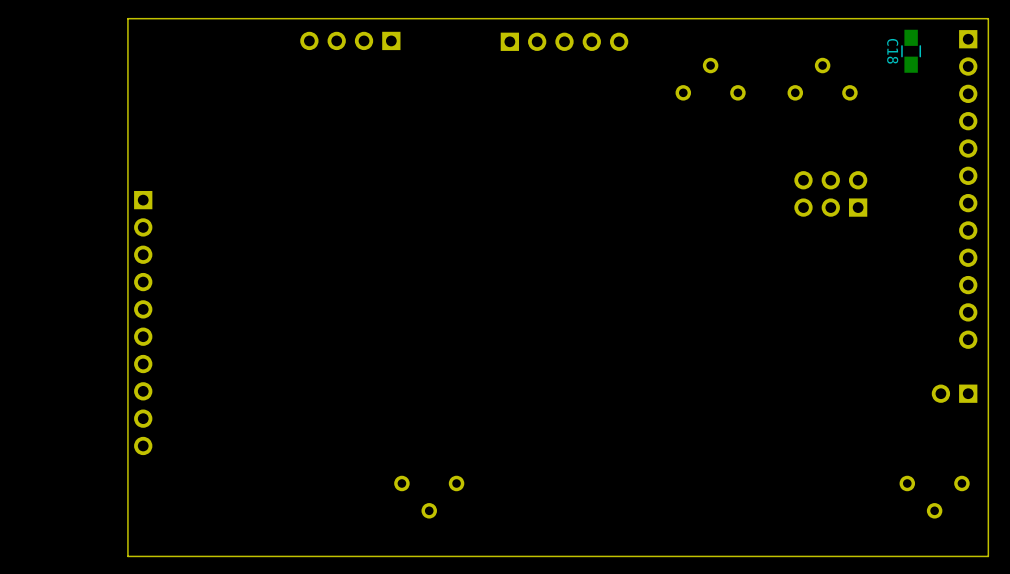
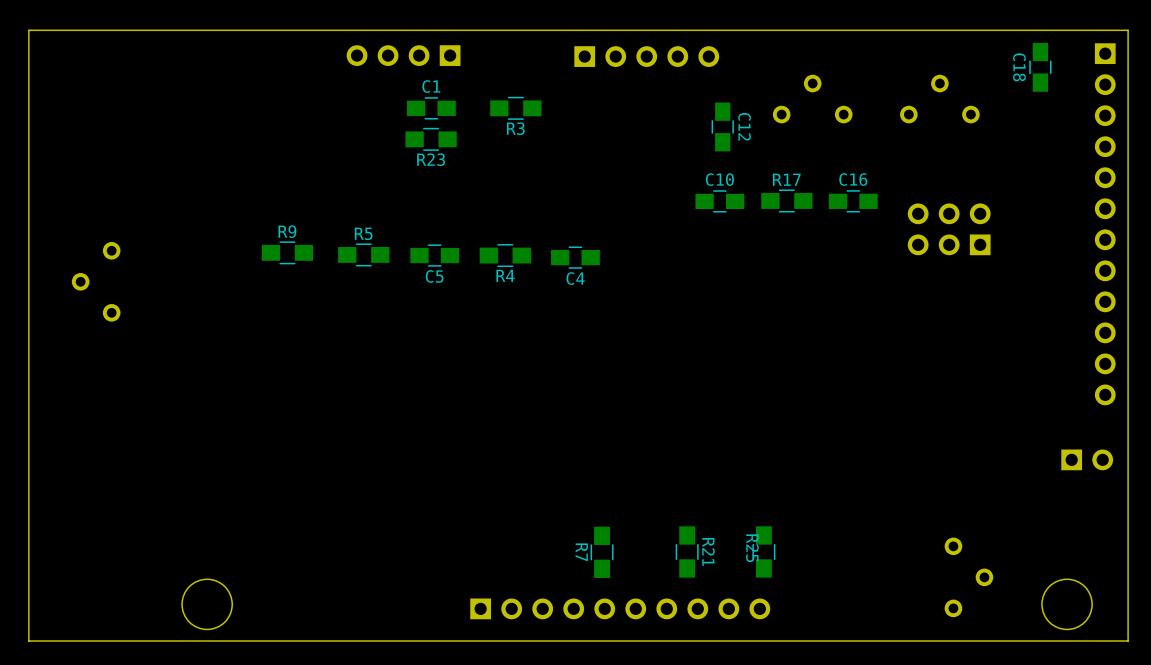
board edge: (127, 18) (127, 556) -> (150, 30) (28, 30) (28, 641) (150, 641)
C1: none -> (431, 108)
R3: none -> (515, 108)
C12: none -> (722, 126)
R23: none -> (431, 139)
R17: none -> (786, 200)
C10: none -> (719, 201)
C16: none -> (853, 201)
R9: none -> (287, 252)
R5: none -> (363, 254)
C5: none -> (434, 255)
R4: none -> (505, 255)
C4: none -> (575, 257)
part: none -> (96, 281)
part: (143, 323) -> none
part rotation: 0° (954, 393) -> 180° (1087, 459)
R7: none -> (602, 552)
R21: none -> (687, 551)
R25: none -> (763, 551)
part: (429, 497) -> none
part rotation: 0° (934, 497) -> 90° counterclockwise (968, 577)
part position: (934, 497) -> (968, 577)
round board edge: none -> [181, 578, 233, 630]
round board edge: none -> [1041, 578, 1093, 630]
part: none -> (620, 608)

